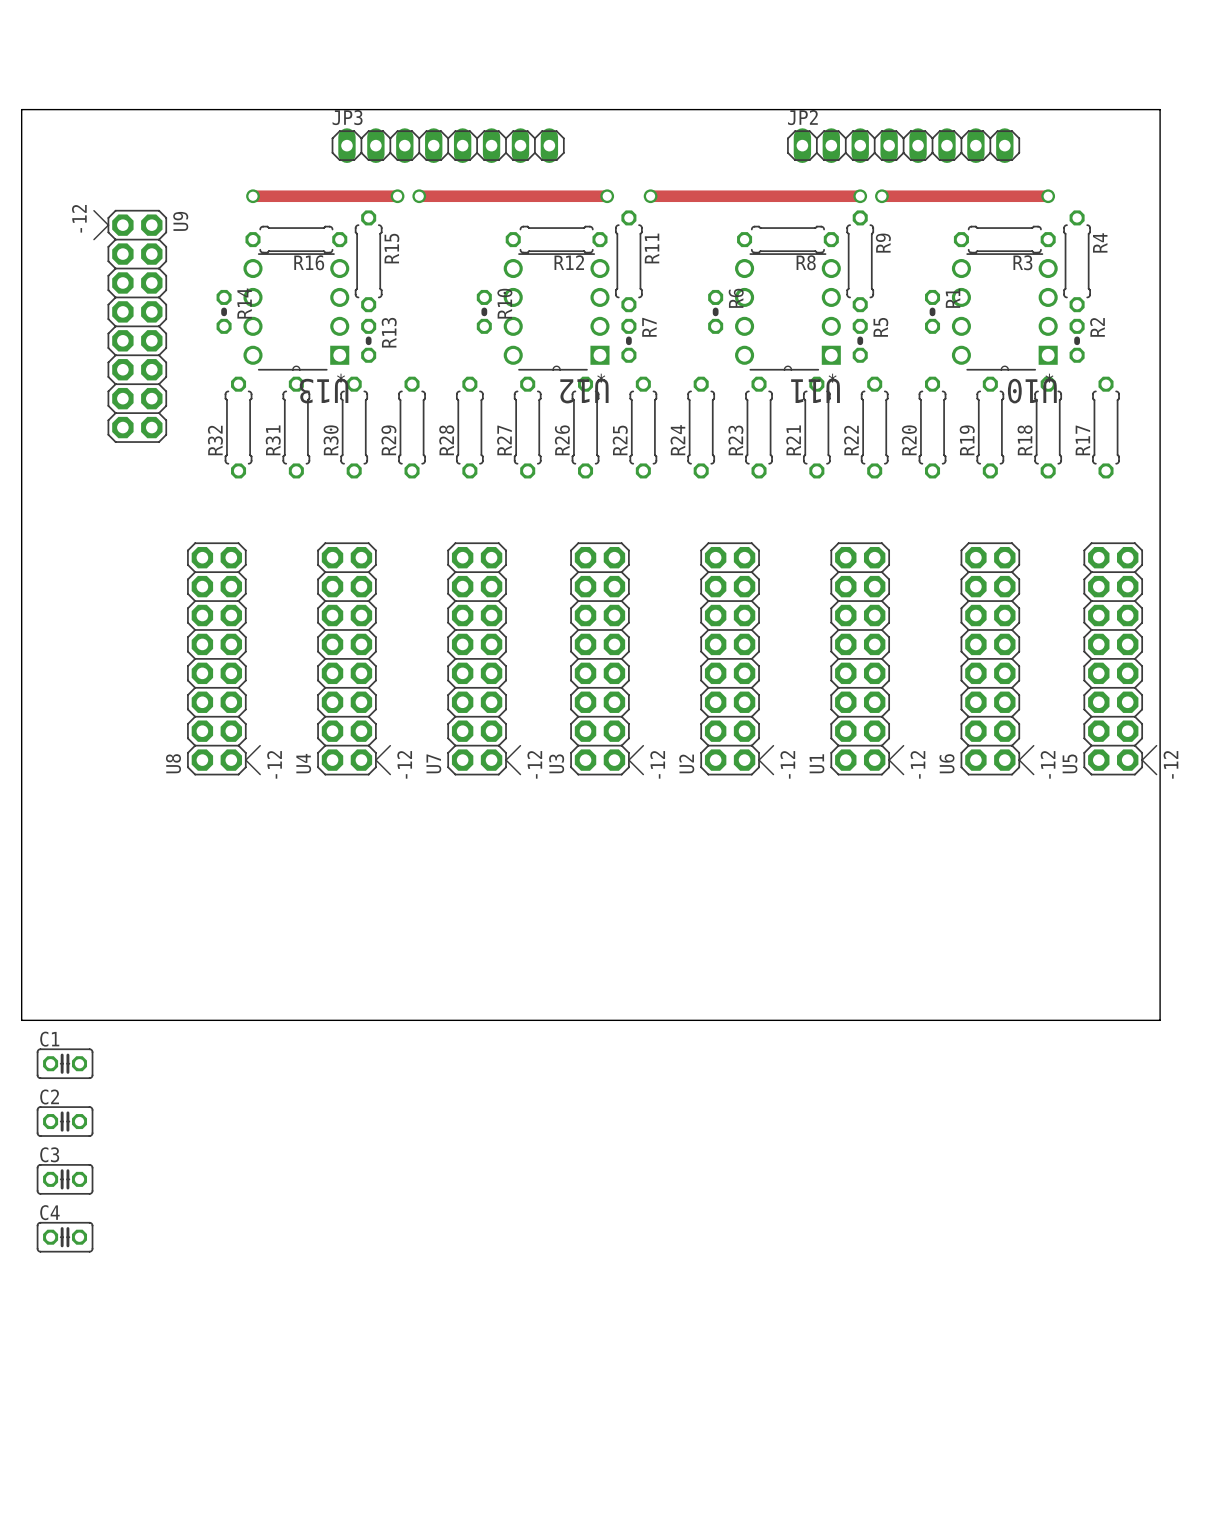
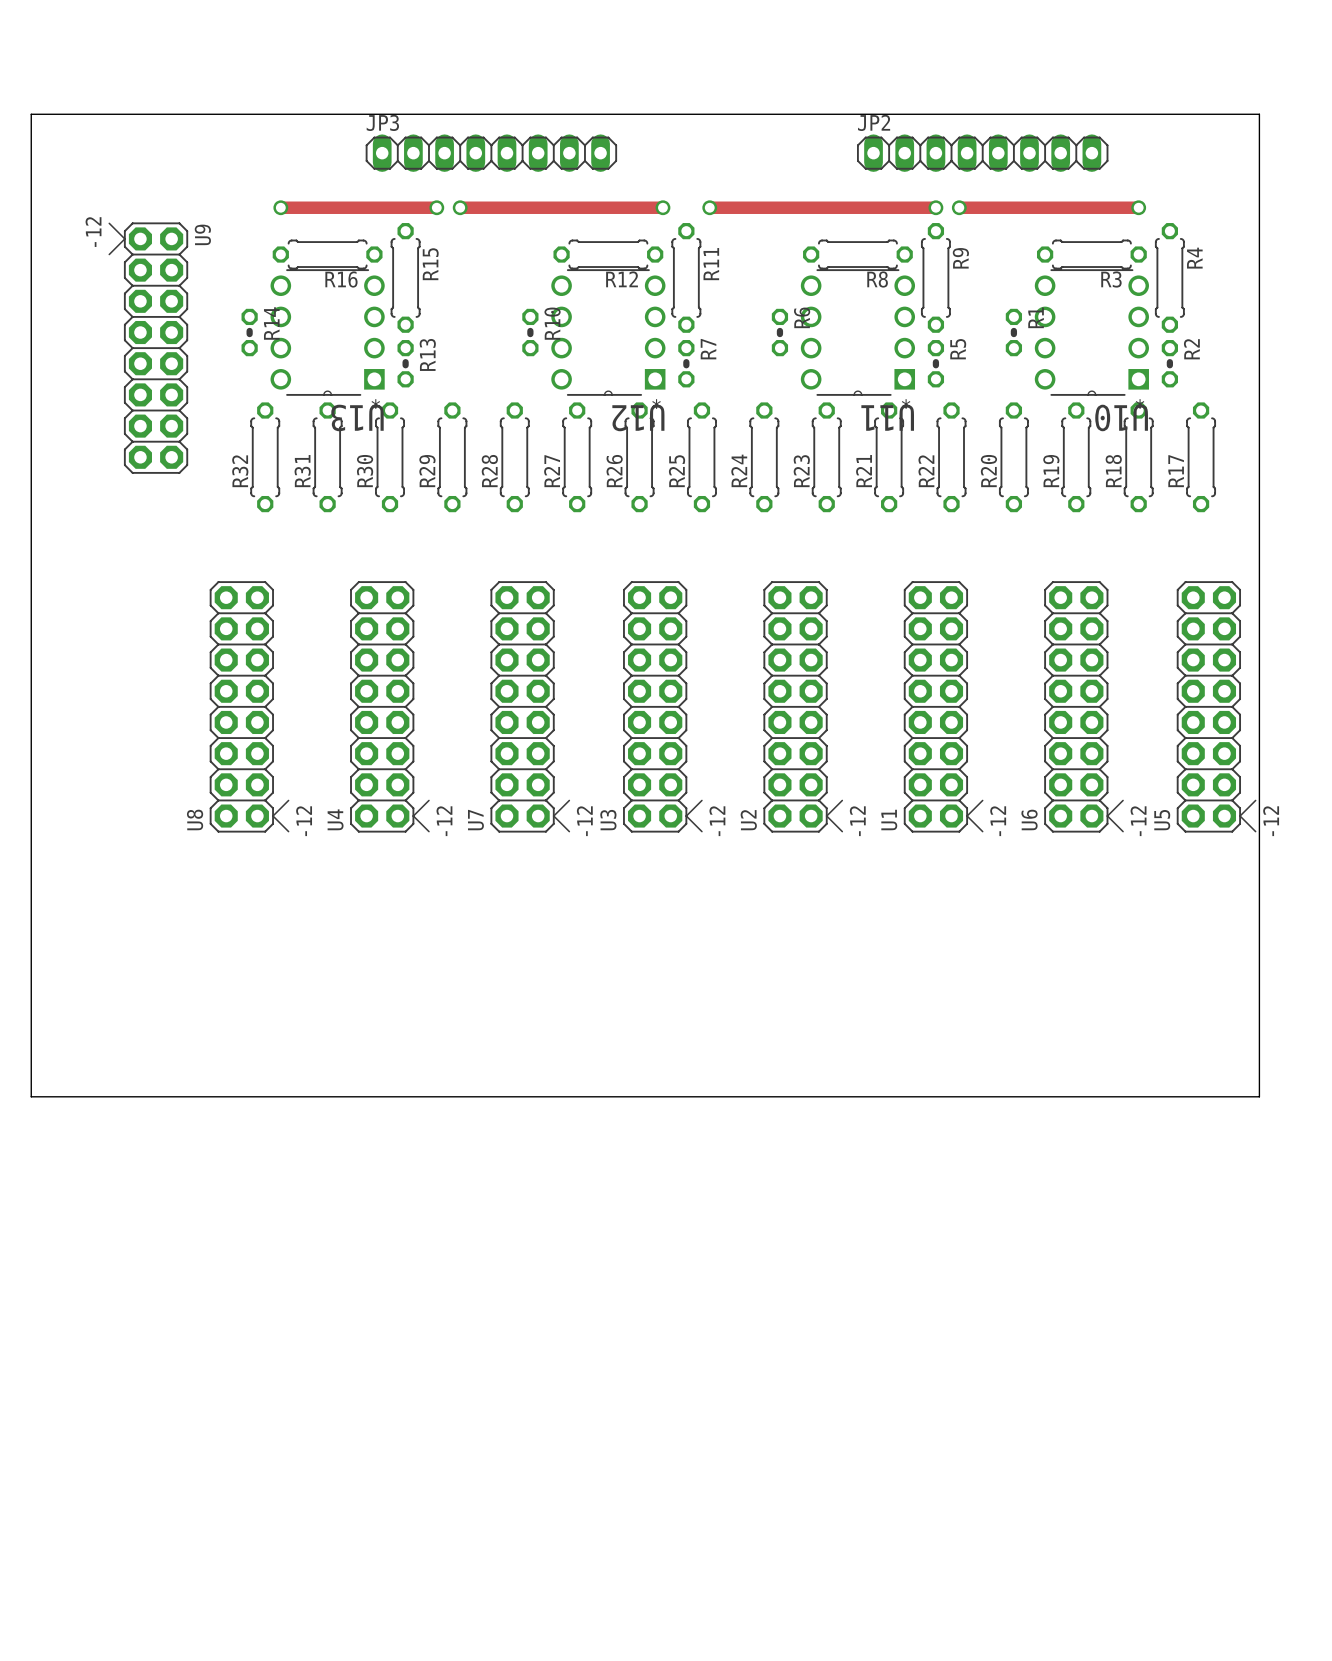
C1: (65, 1063) -> none
C2: (65, 1121) -> none
C3: (65, 1179) -> none
C4: (65, 1237) -> none

